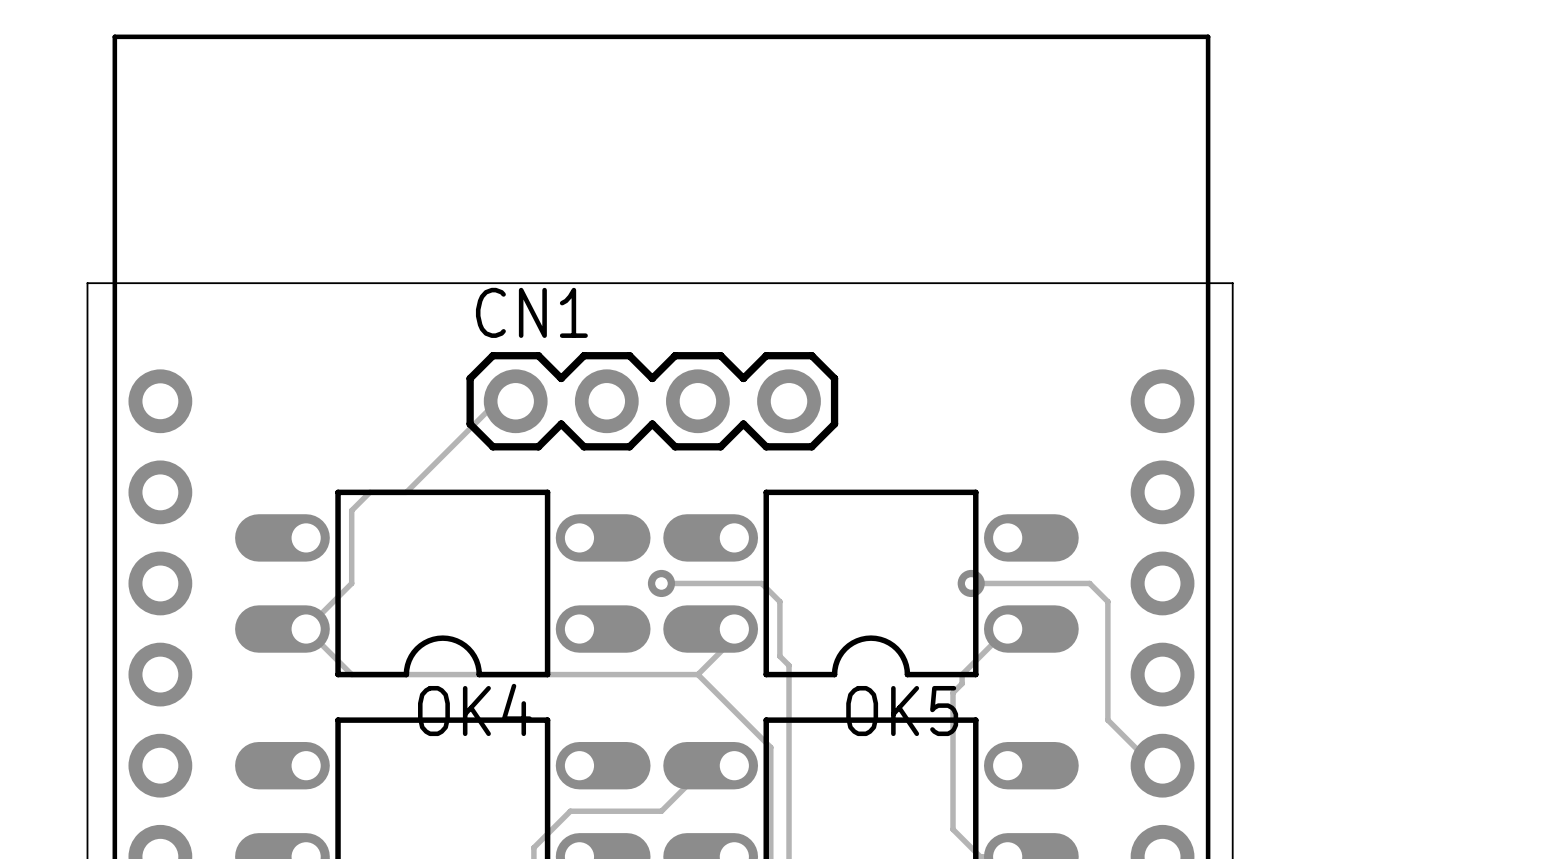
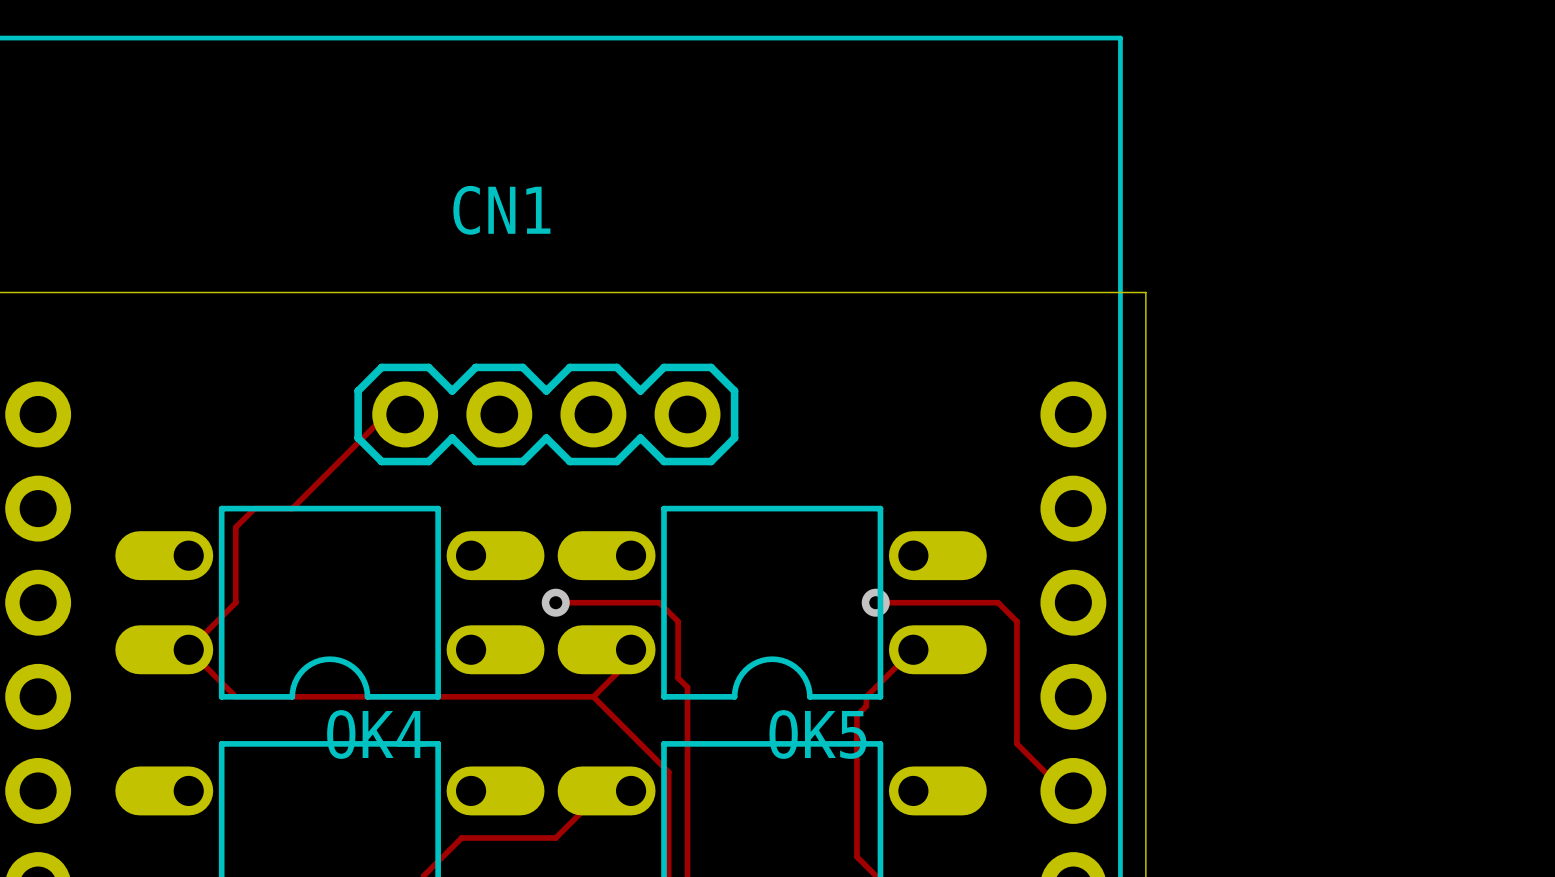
CN1 name position: CN1 (531, 312) -> CN1 (501, 210)

